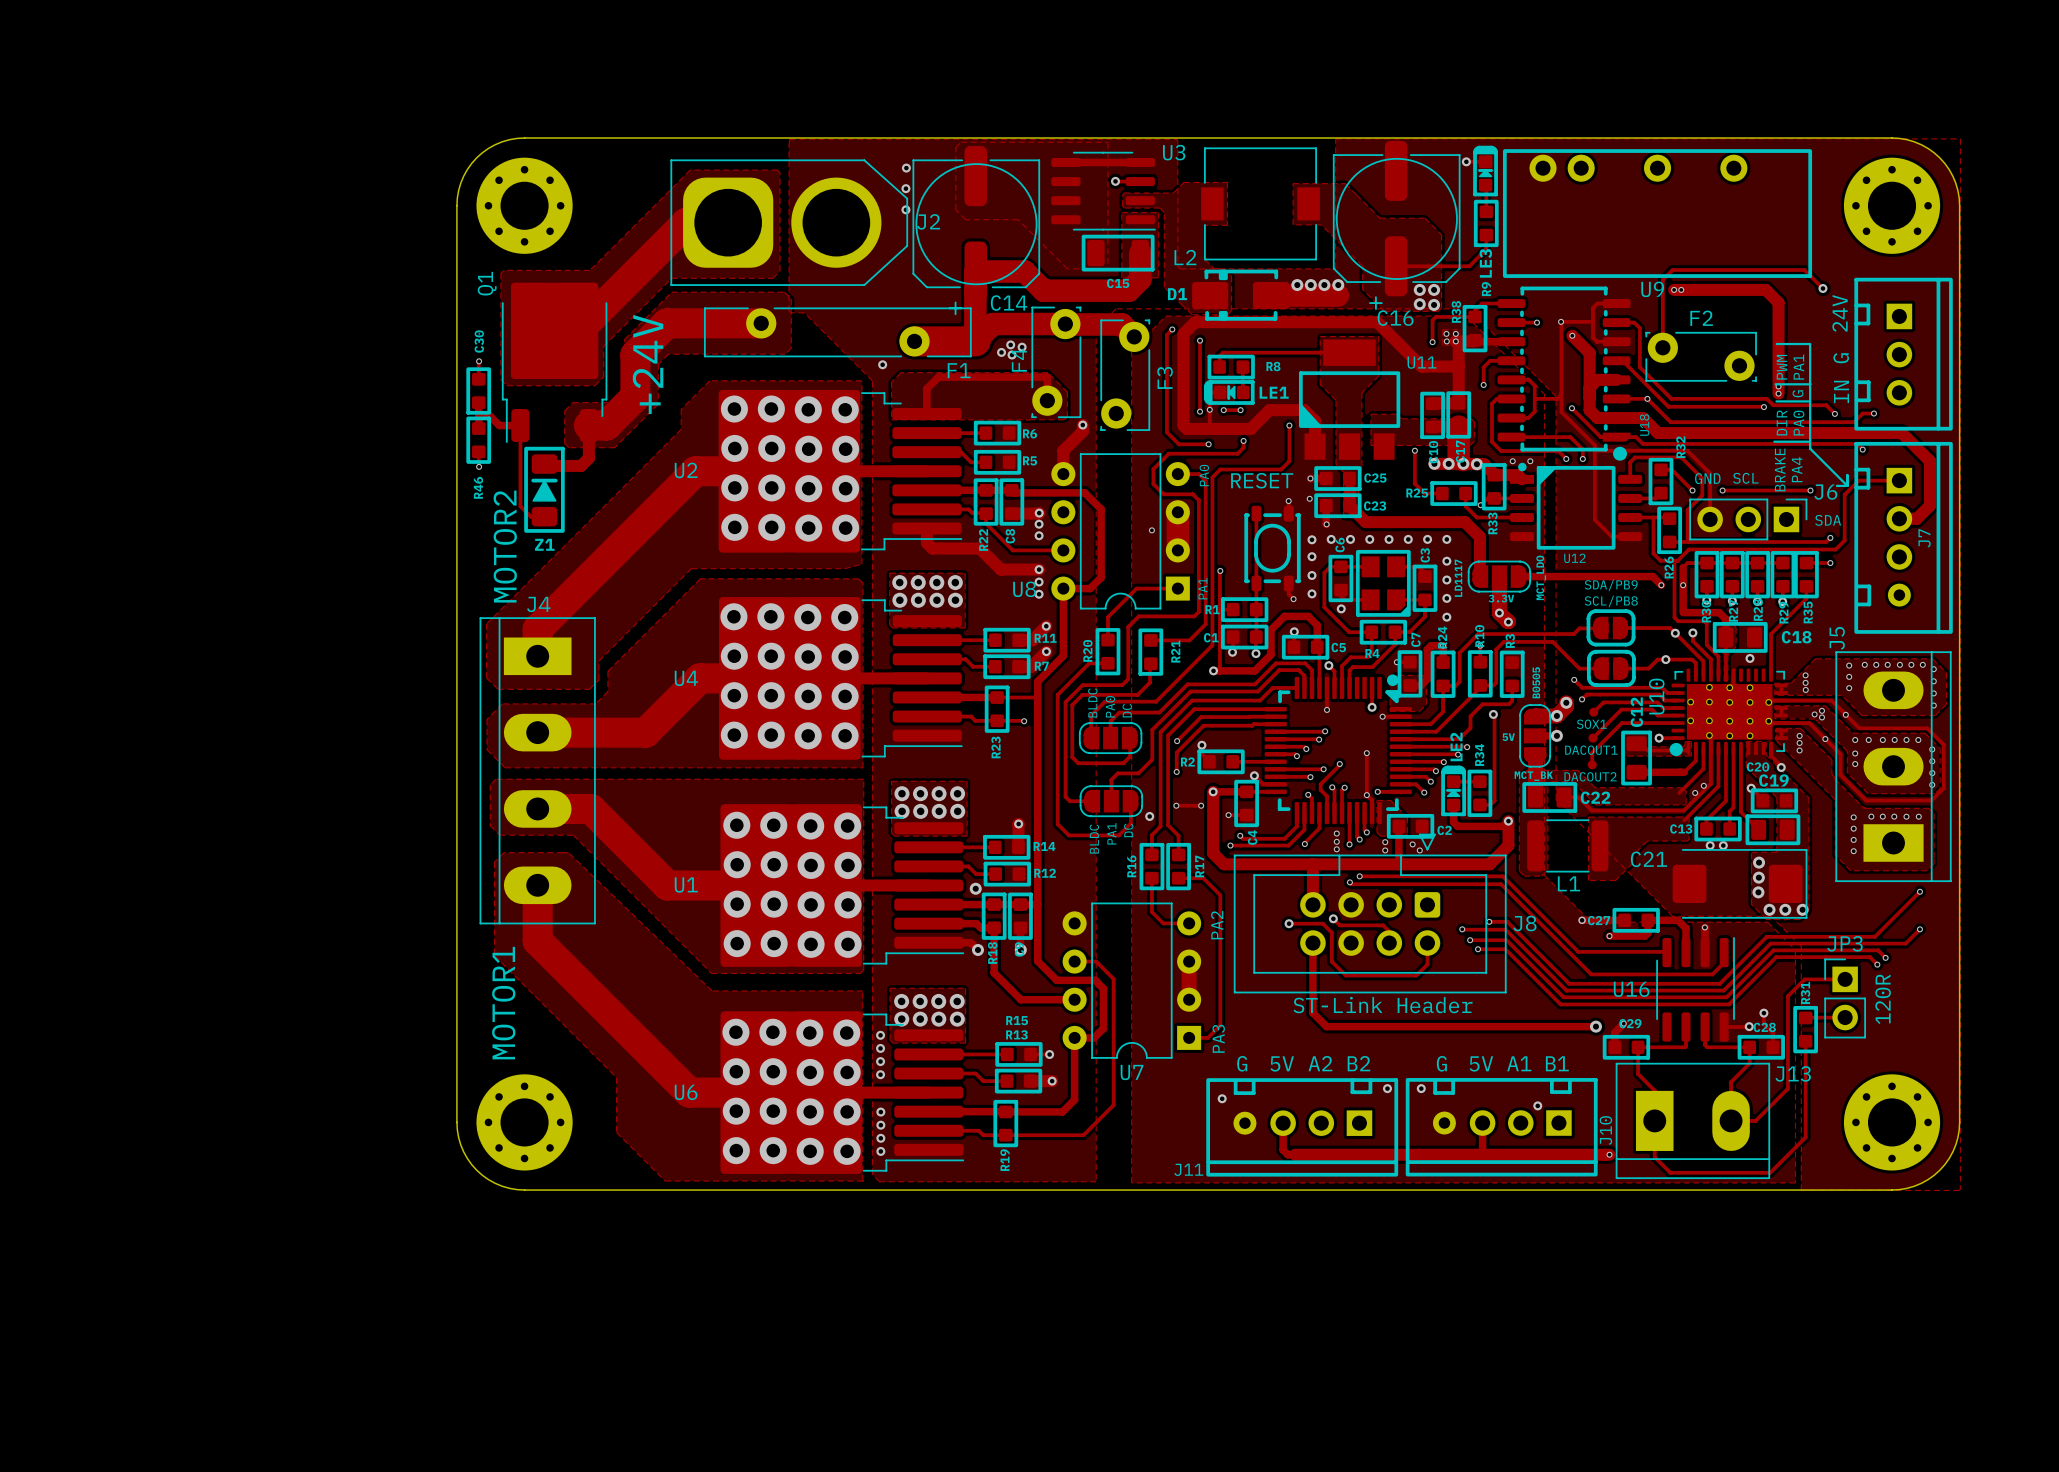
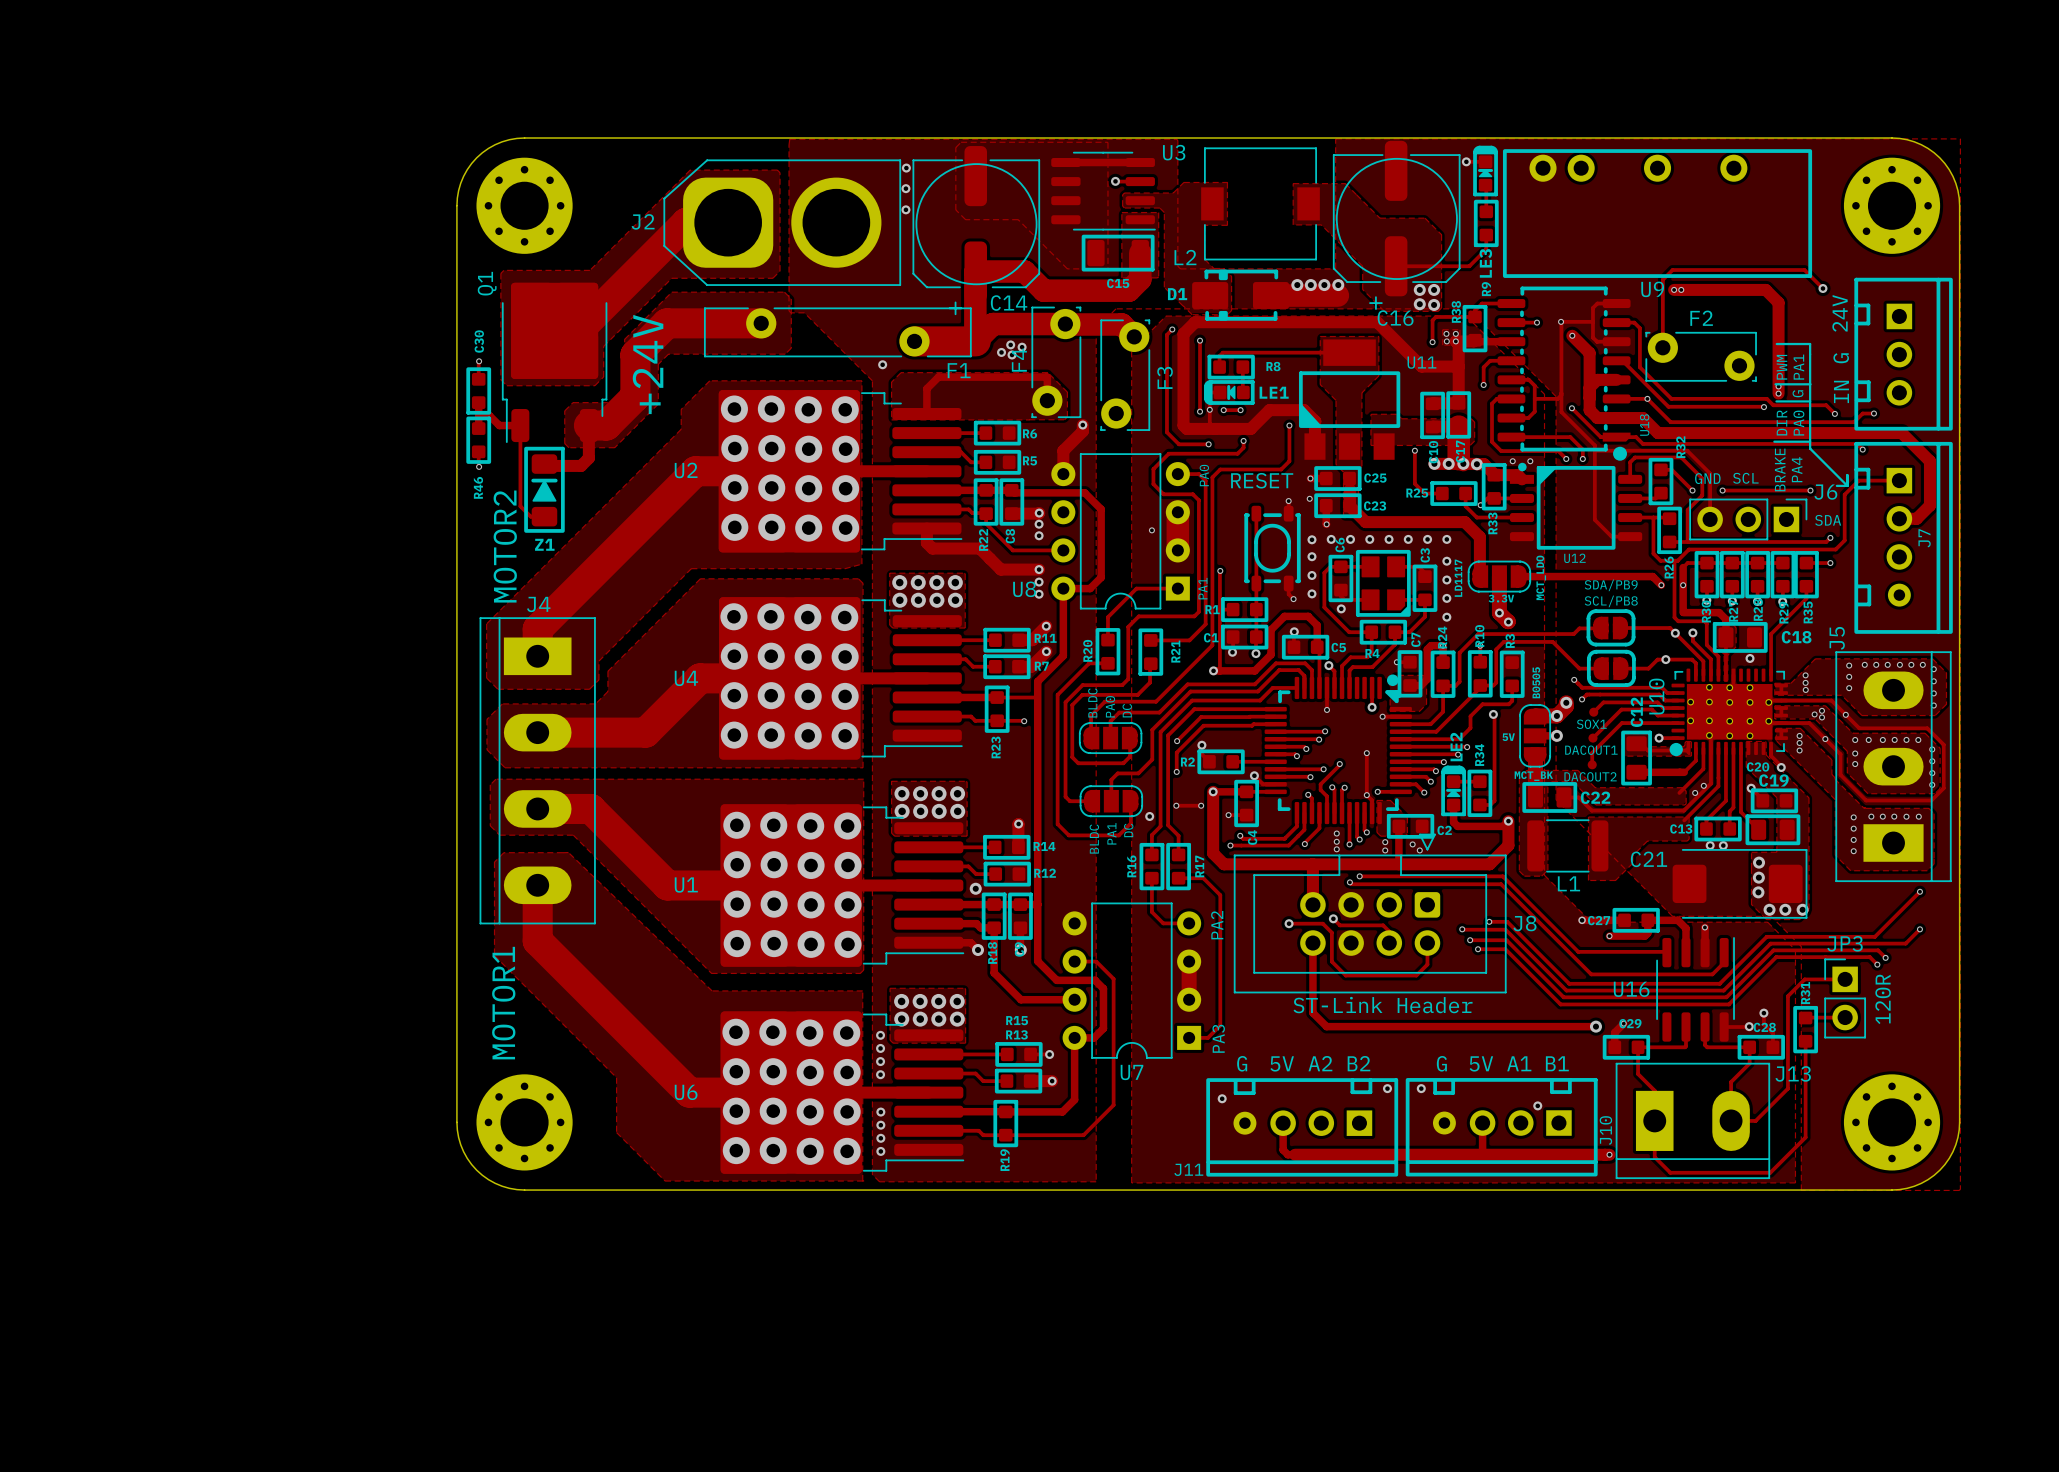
J2 footprint: [670, 159, 909, 286] -> [663, 159, 902, 286]
J2 name position: J2 (928, 221) -> J2 (643, 221)

